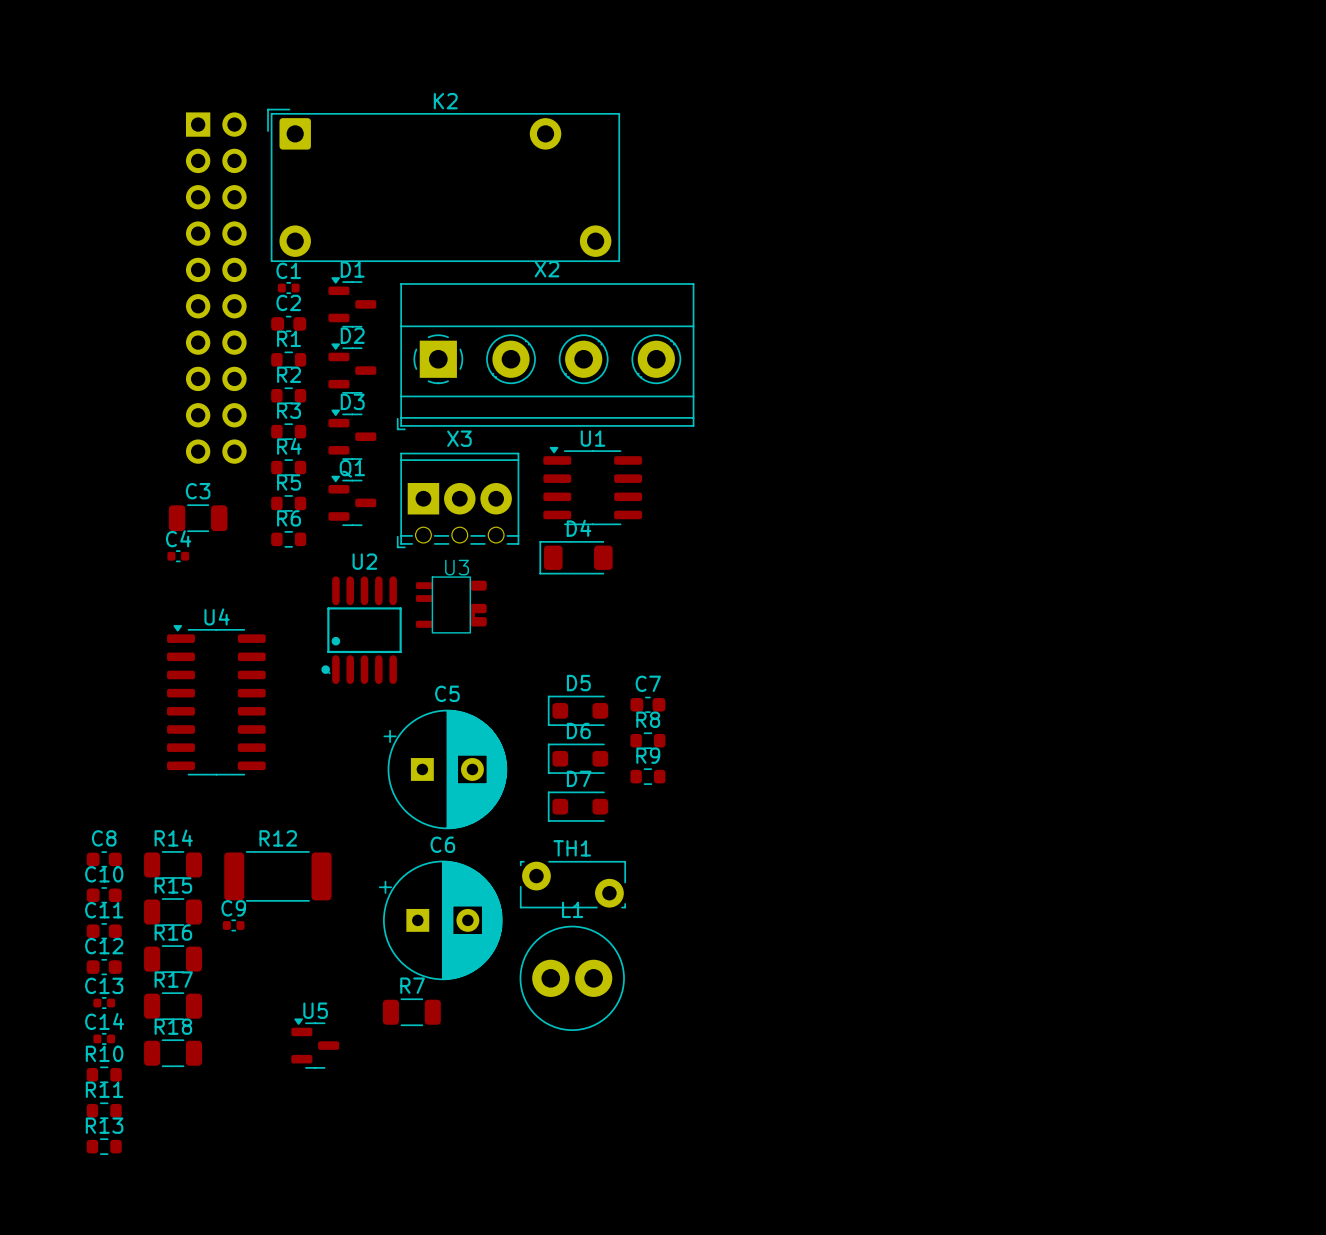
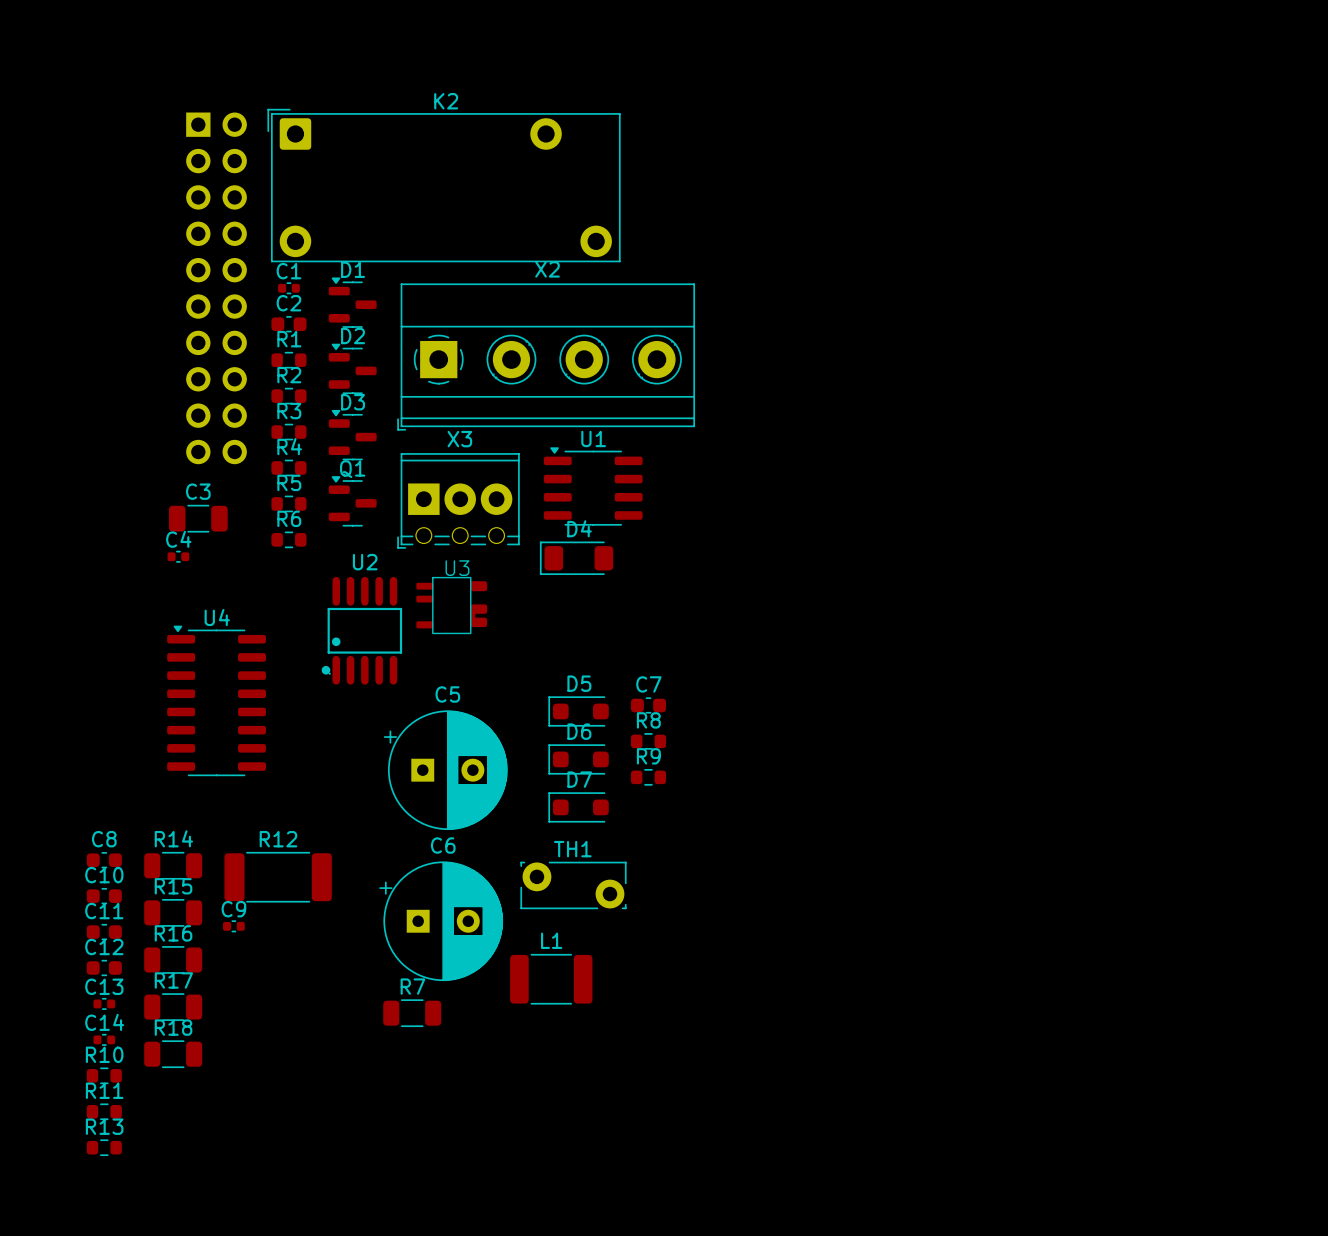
L1 name position: L1 (572, 909) -> L1 (551, 940)
L1 footprint: [519, 925, 625, 1031] -> [510, 953, 593, 1005]
U5: (315, 1043) -> none

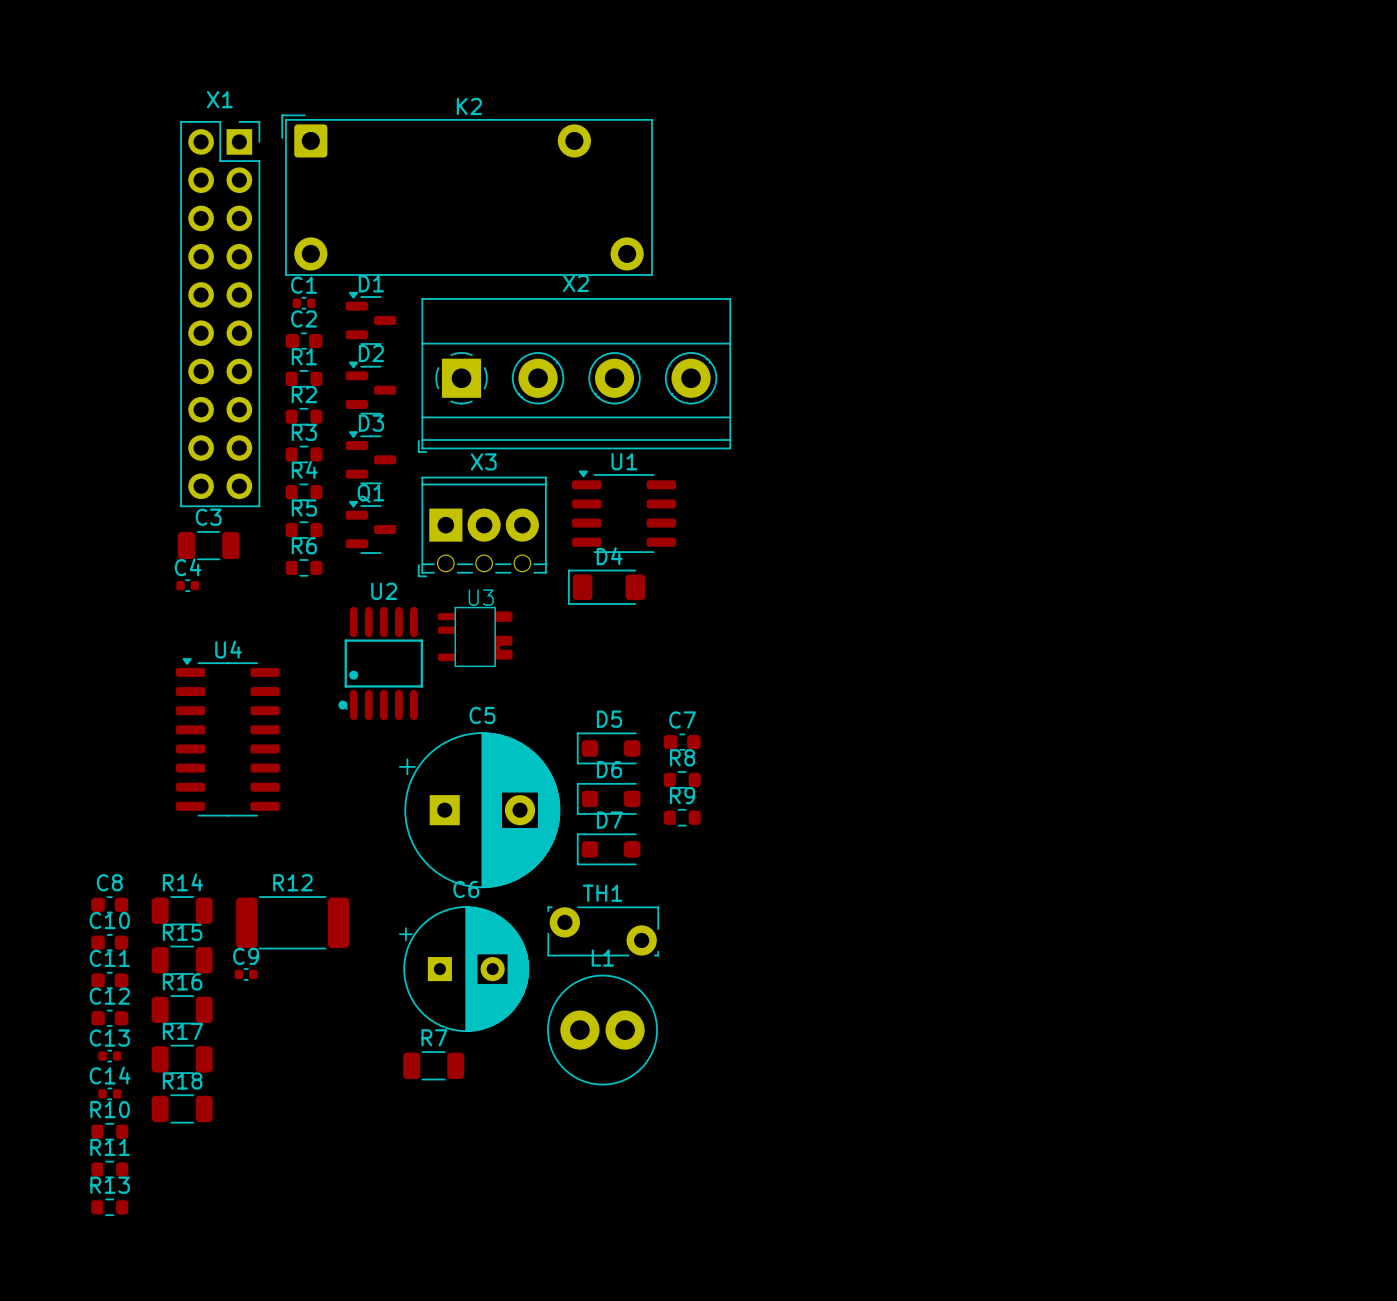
X1 side: bottom (216, 288) -> top (220, 314)
C5 footprint: [383, 710, 508, 831] -> [398, 732, 561, 889]
L1 name position: L1 (551, 940) -> L1 (602, 957)
L1 footprint: [510, 953, 593, 1005] -> [547, 974, 658, 1086]

